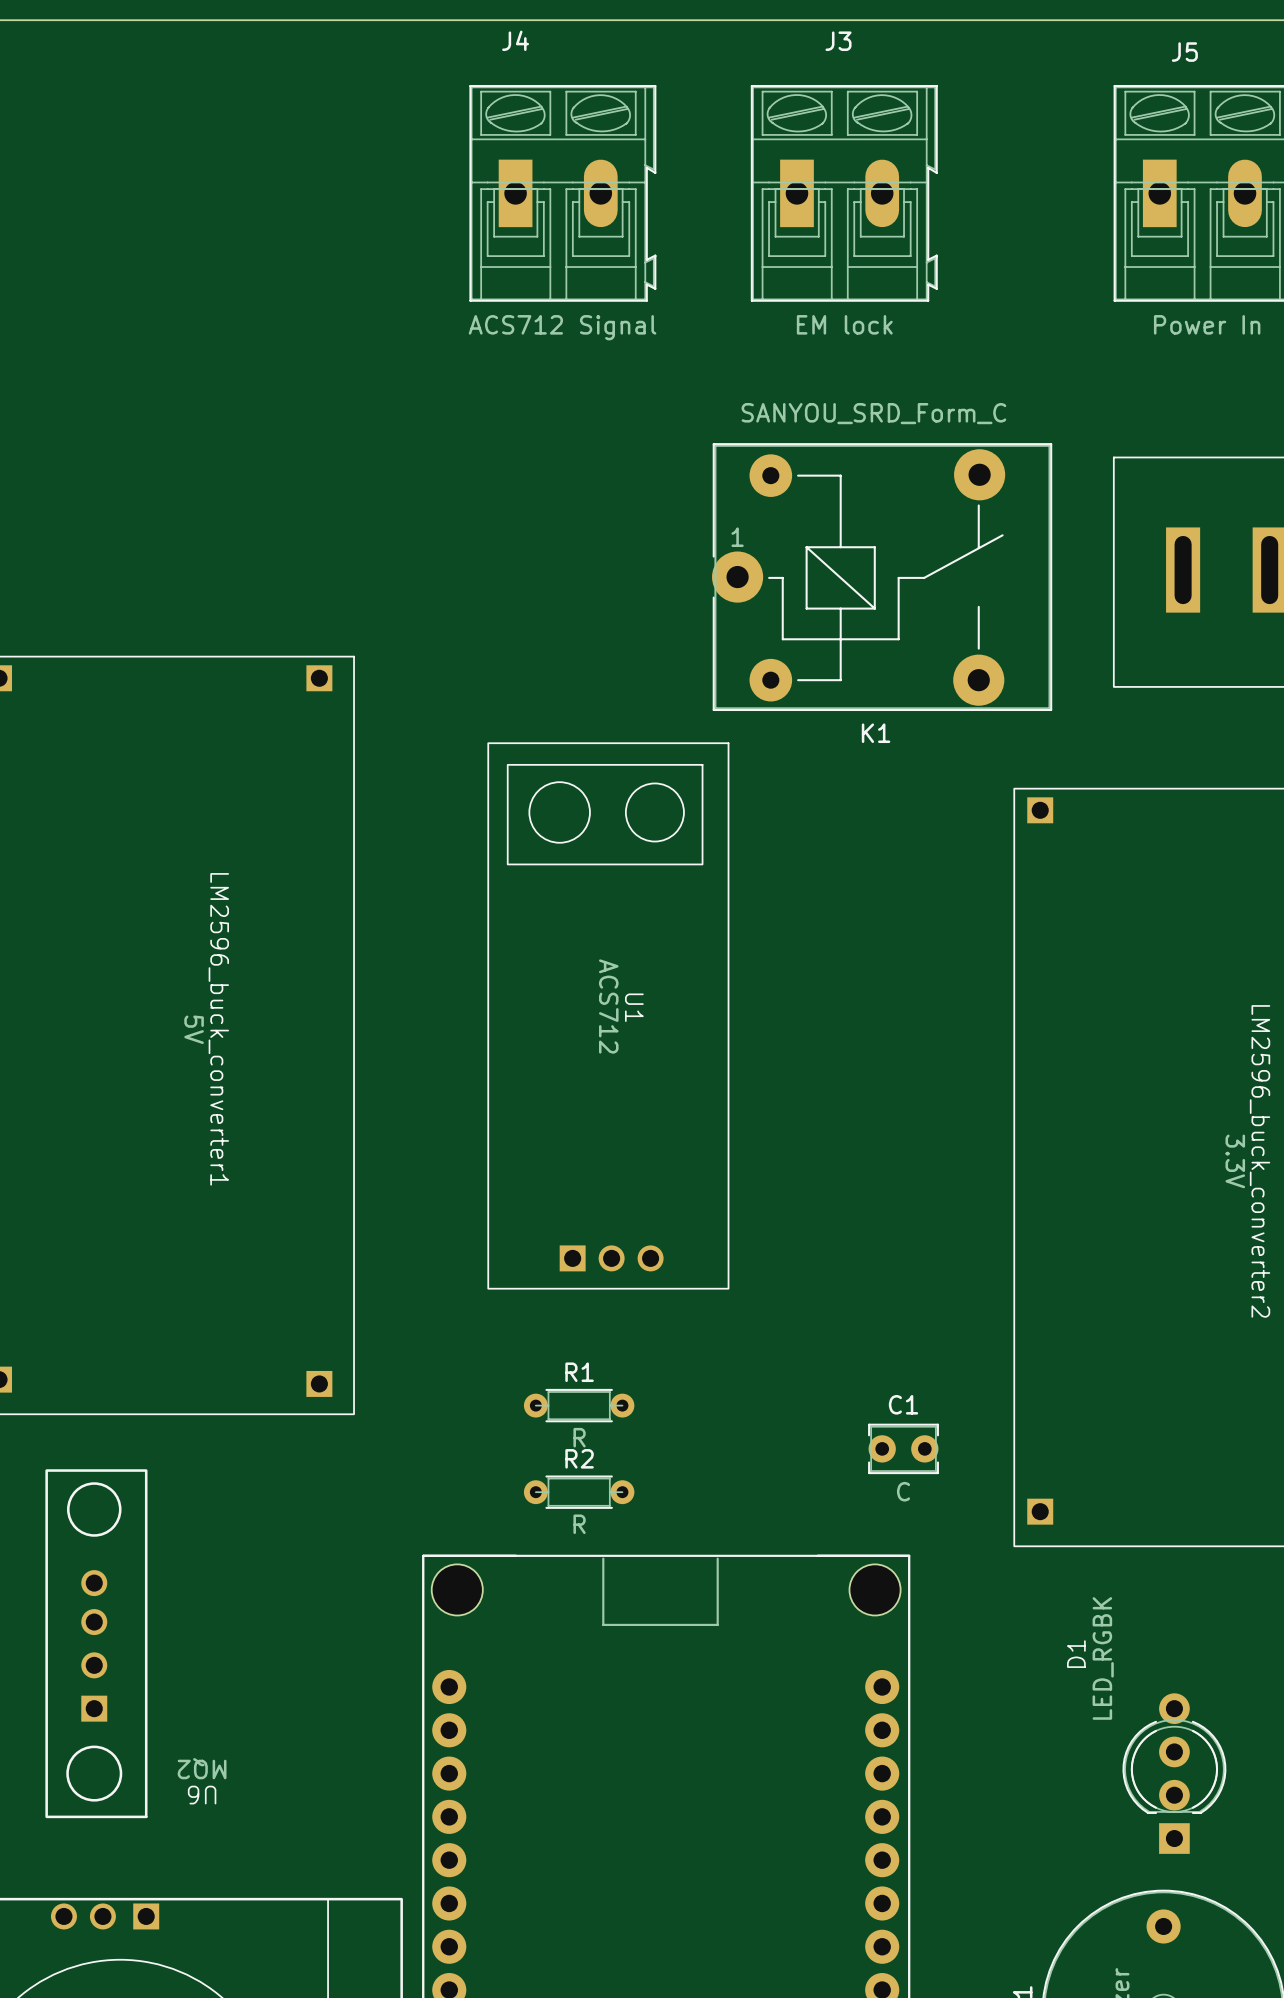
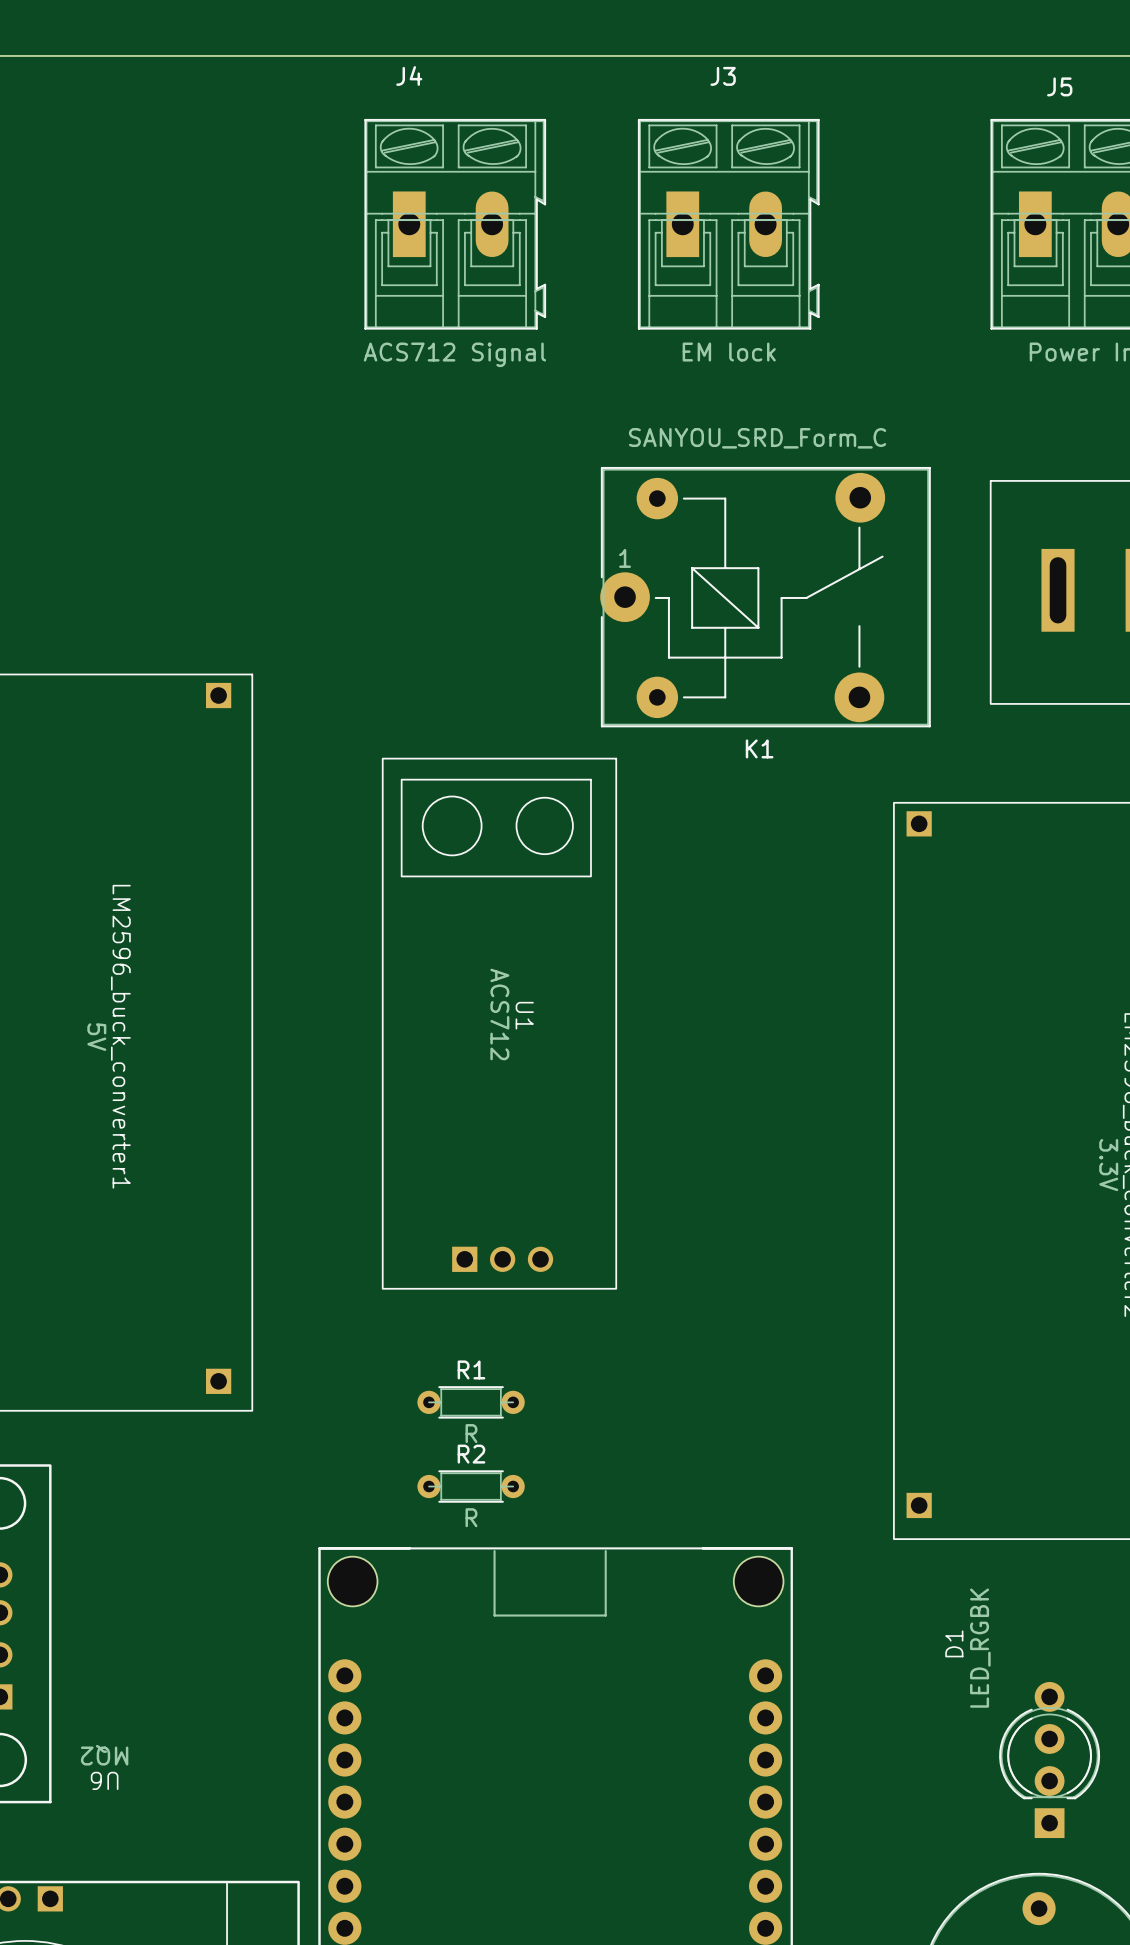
C1: C (903, 1448) -> none

